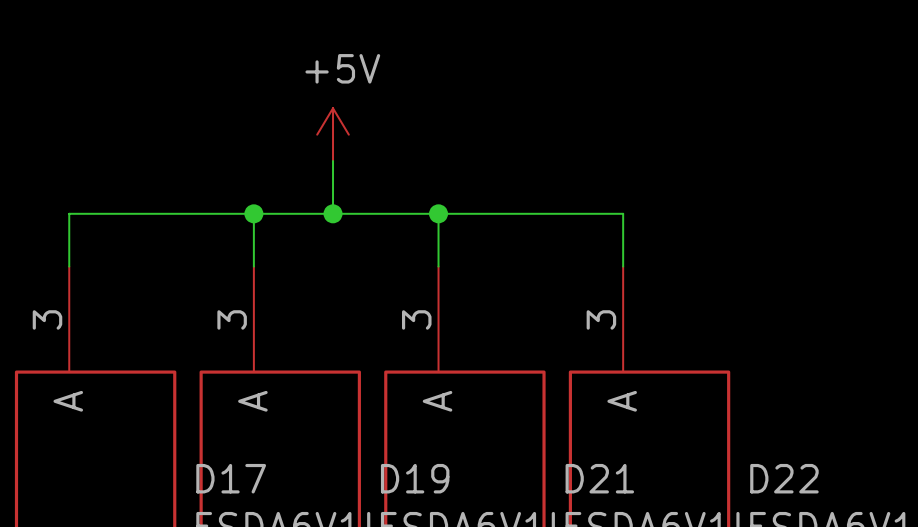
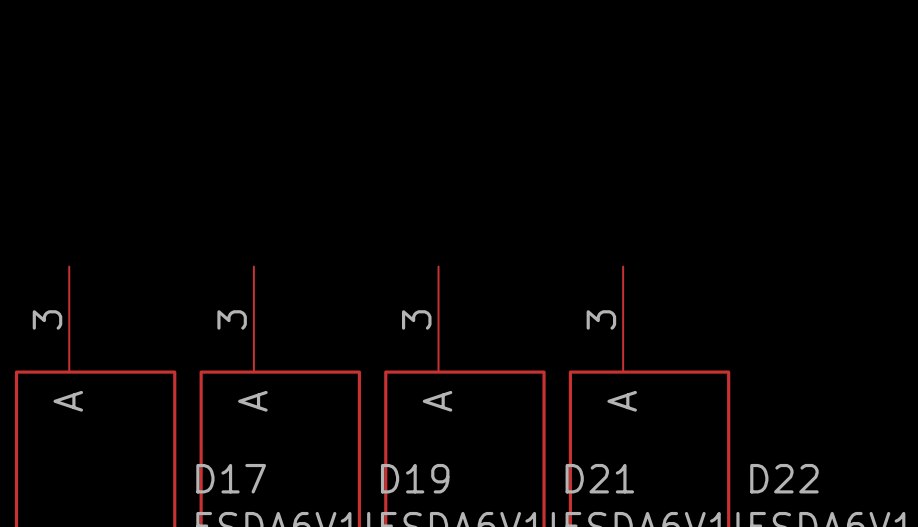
power symbol: +5V (333, 134) -> none
wire: (333, 161) (333, 213) -> none
wire: (253, 213) (253, 266) -> none
junction: (253, 213) -> none
junction: (333, 213) -> none
wire: (438, 213) (438, 266) -> none
junction: (438, 213) -> none
wire: (69, 266) (69, 213) (623, 213) (623, 266) -> none

